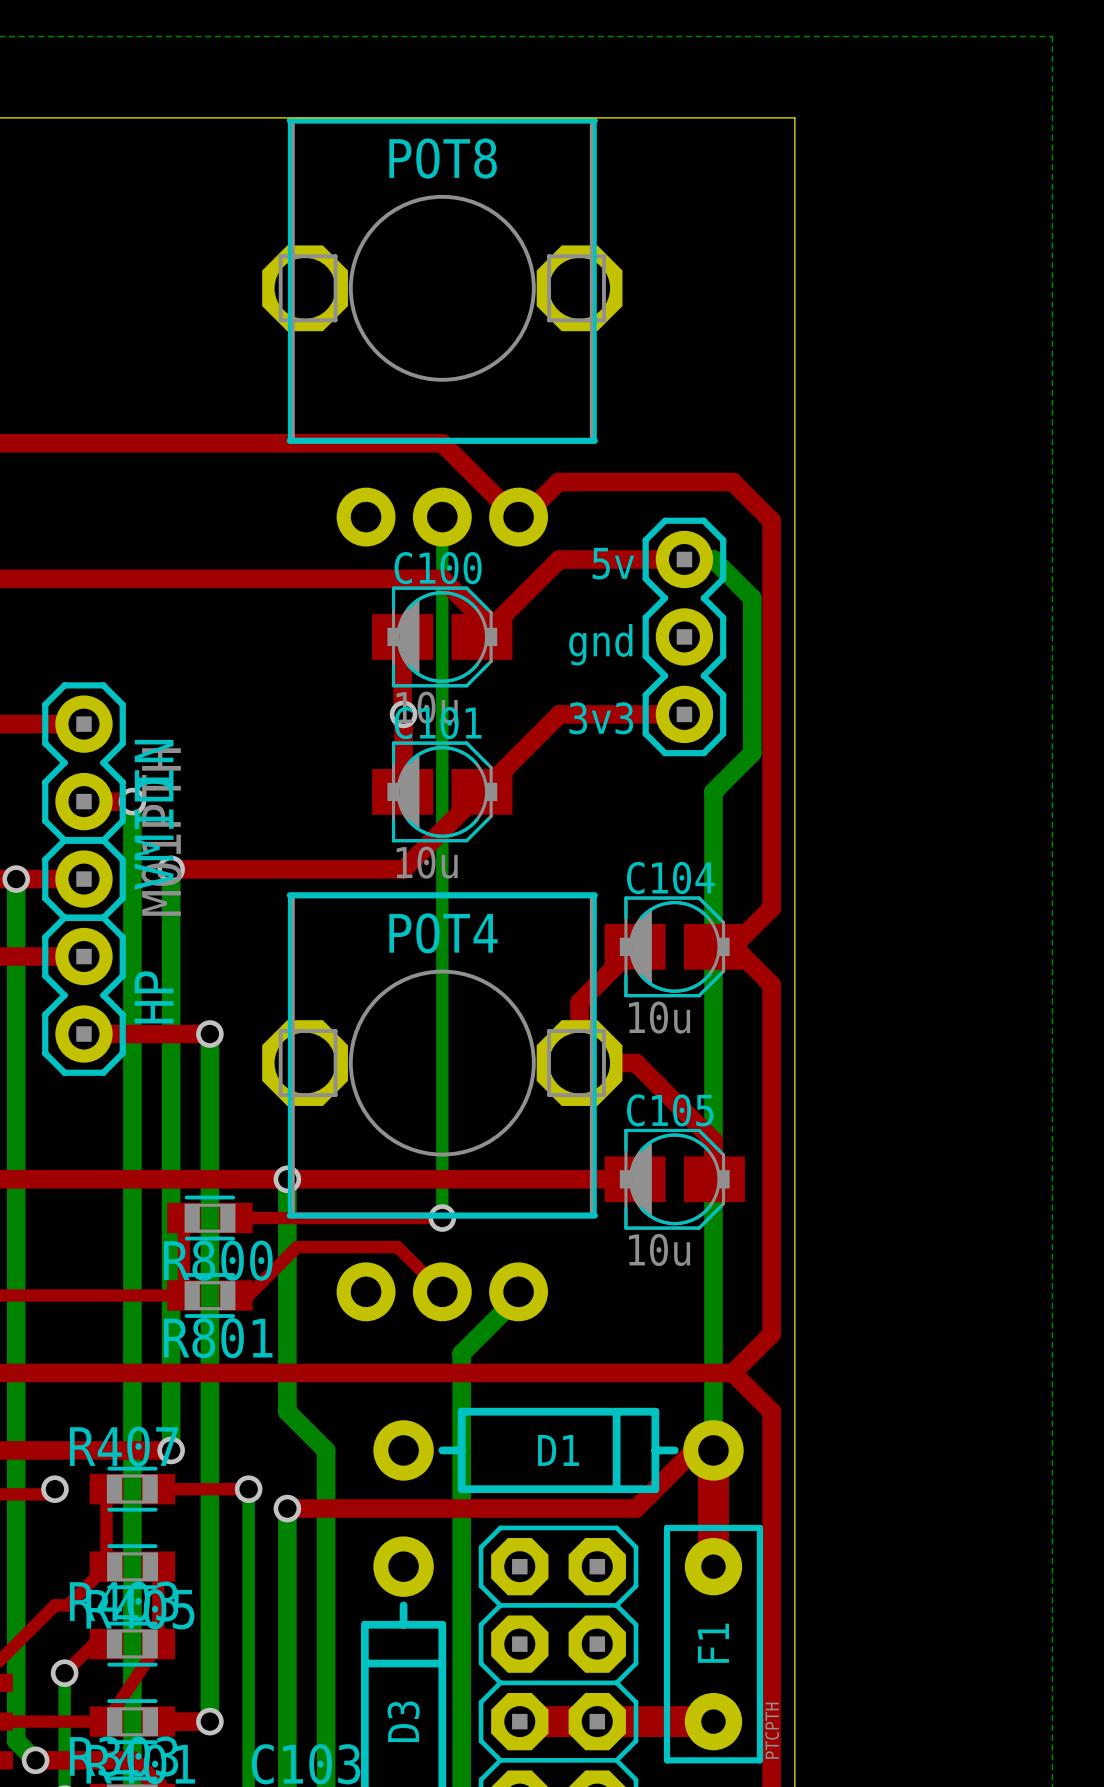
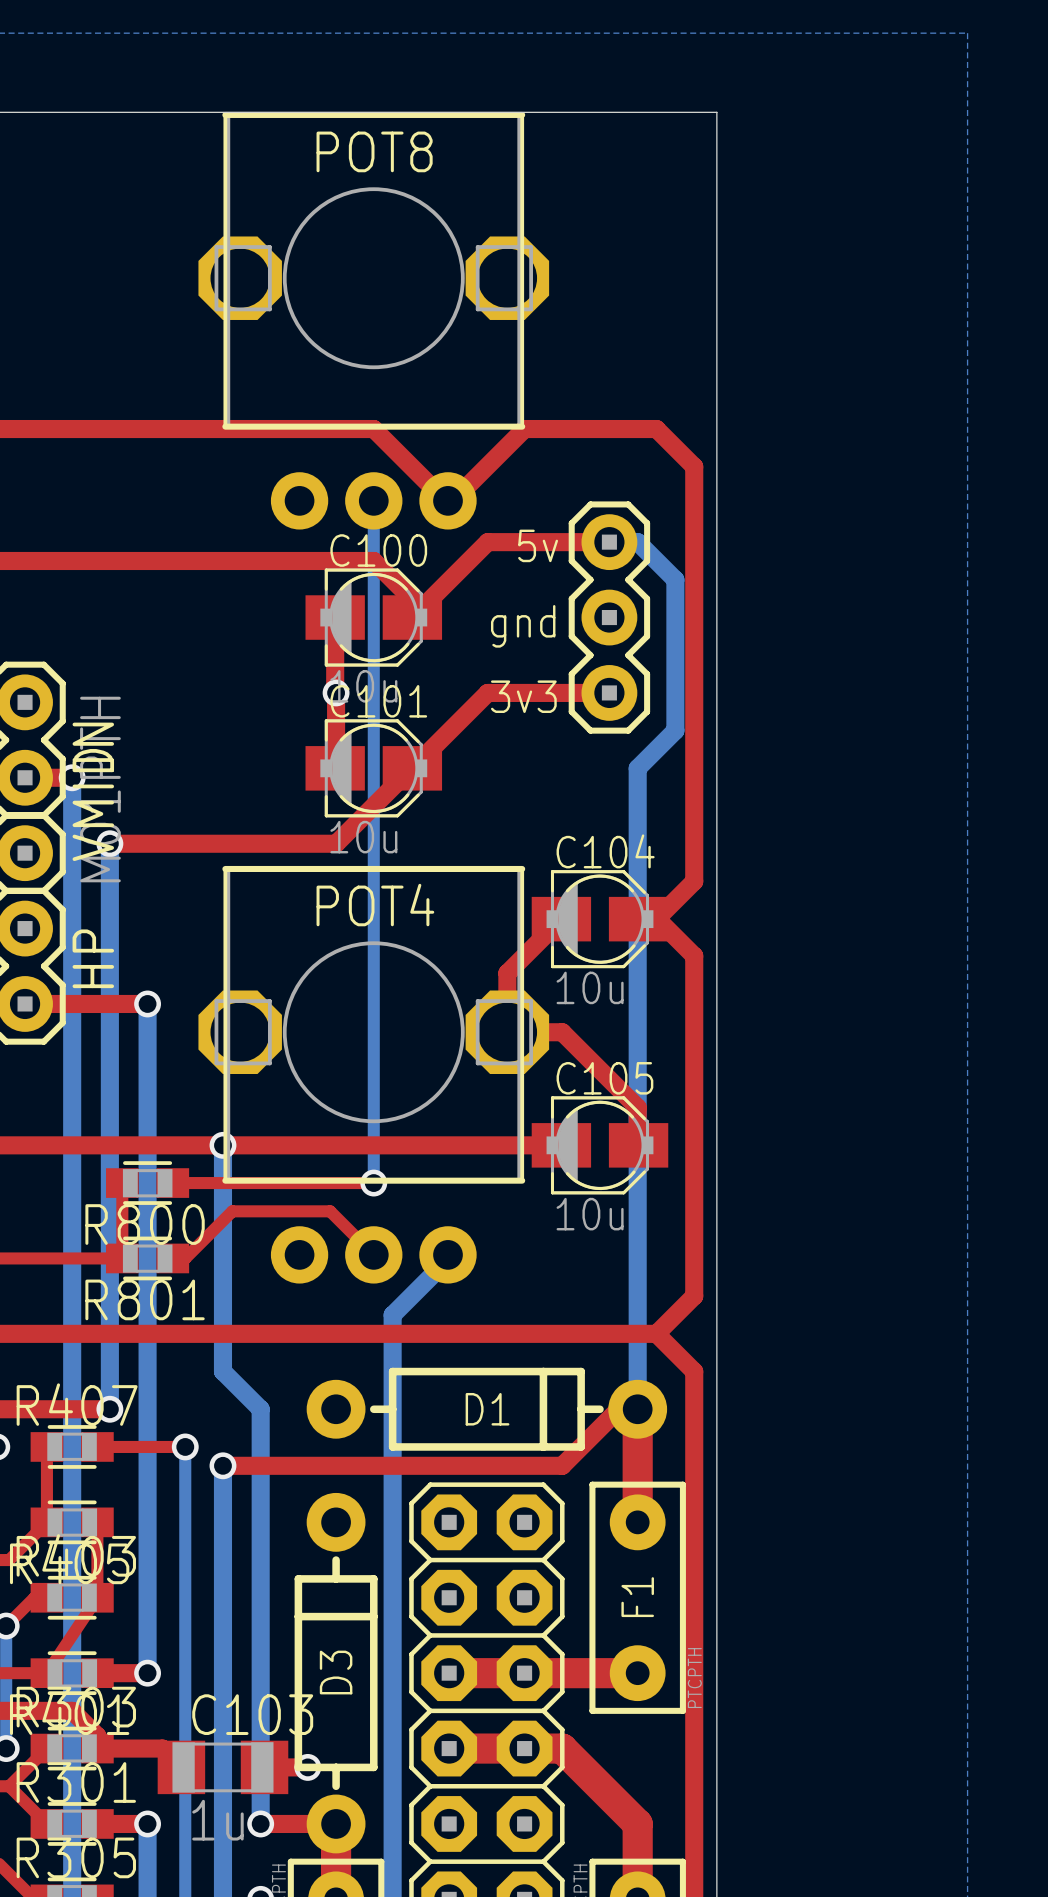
top track: (558, 482) (732, 482) (771, 520) -> (486, 466) (524, 429) (656, 429) (694, 466) (694, 504)

